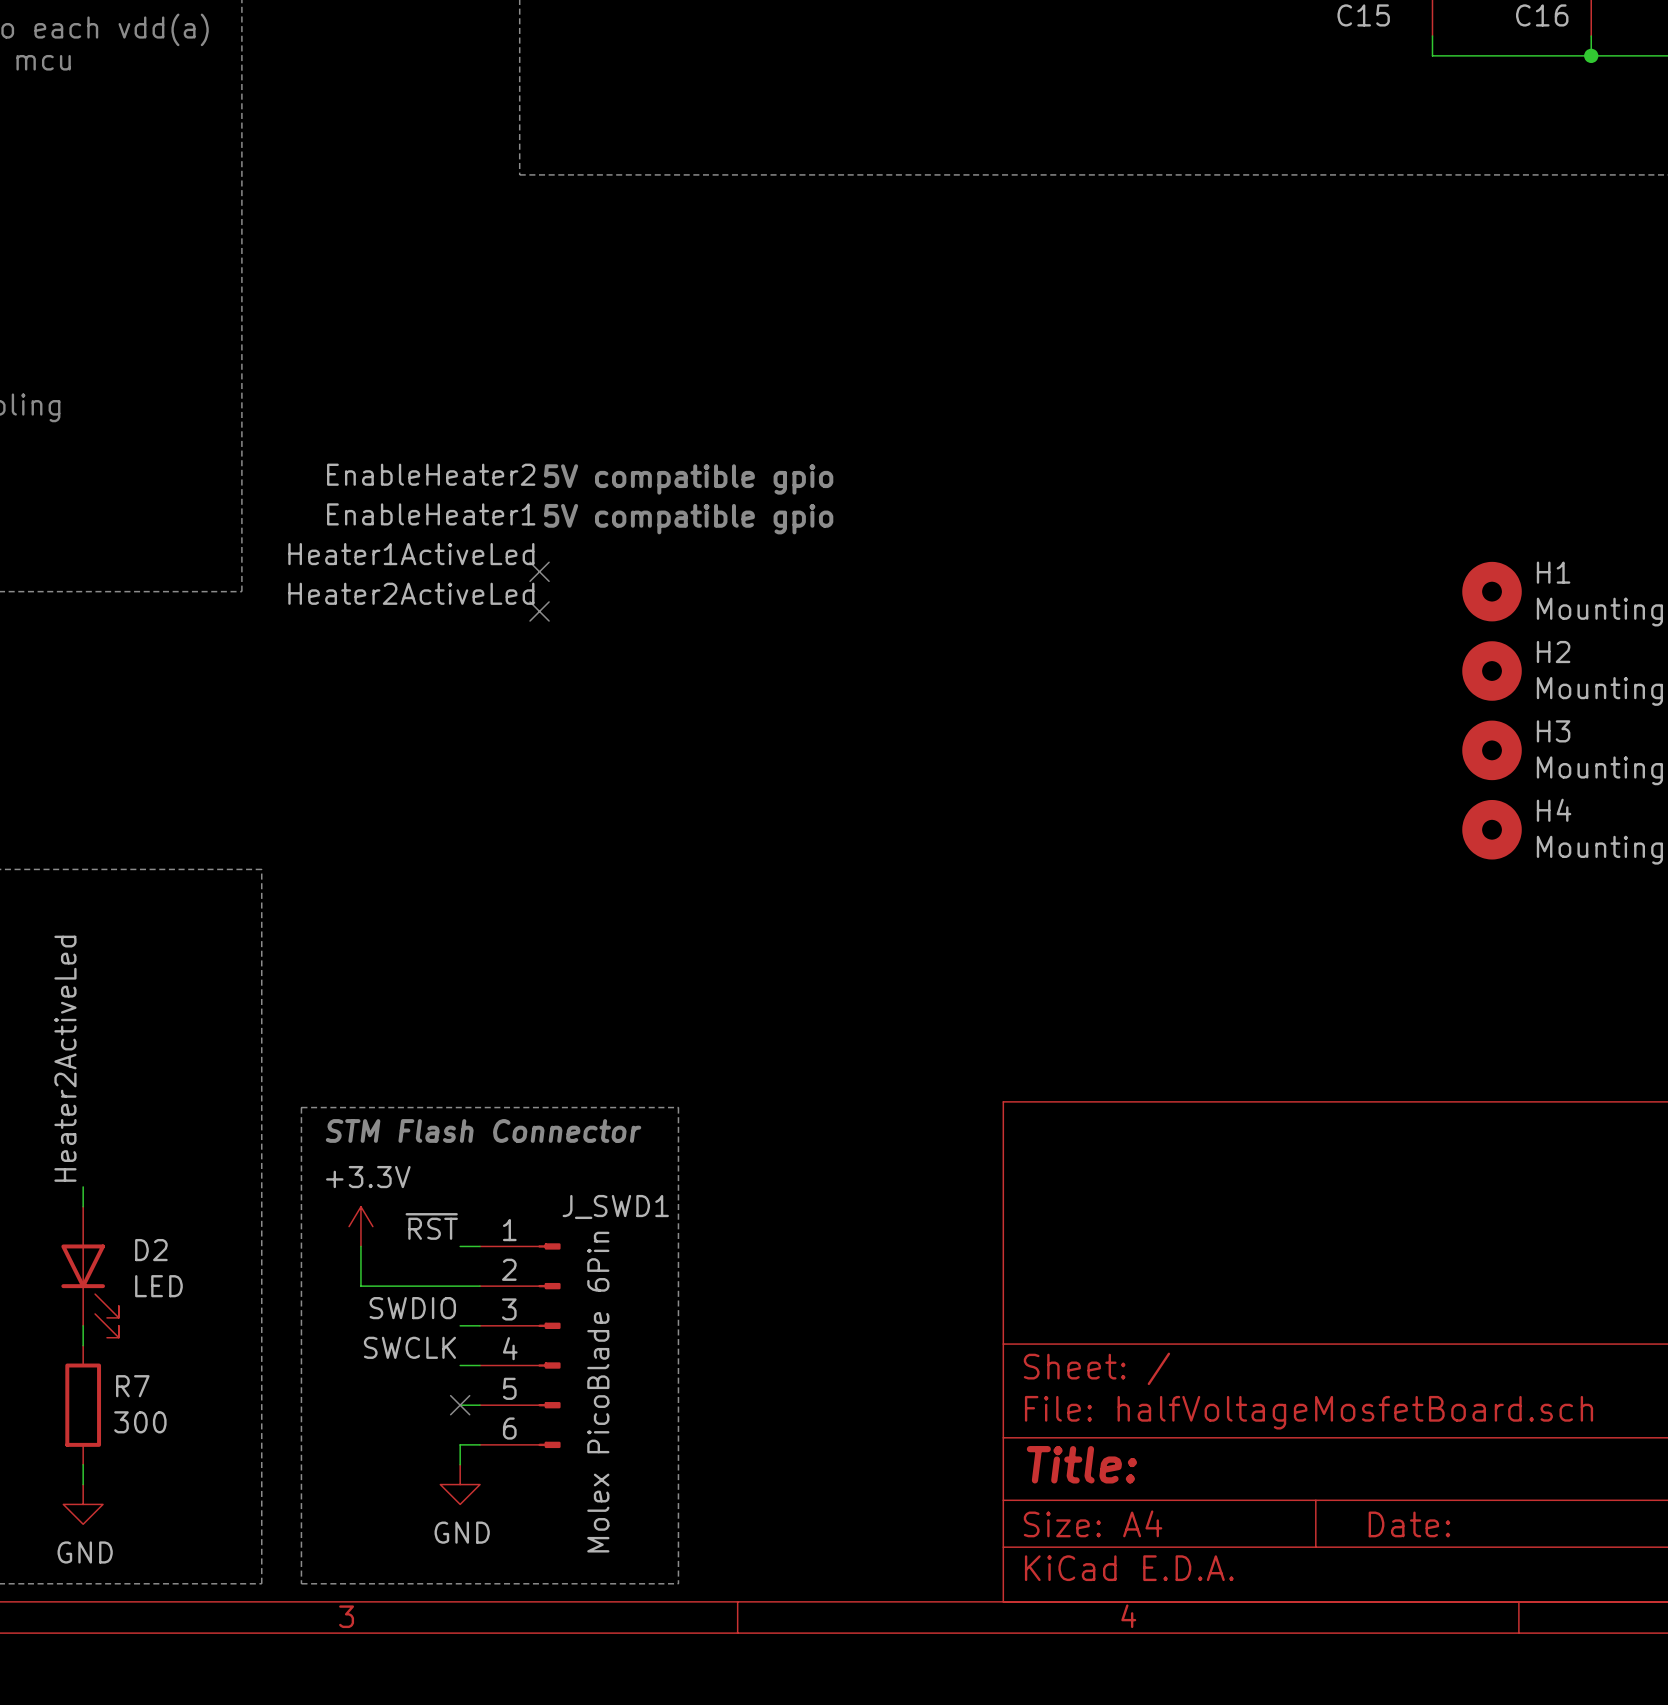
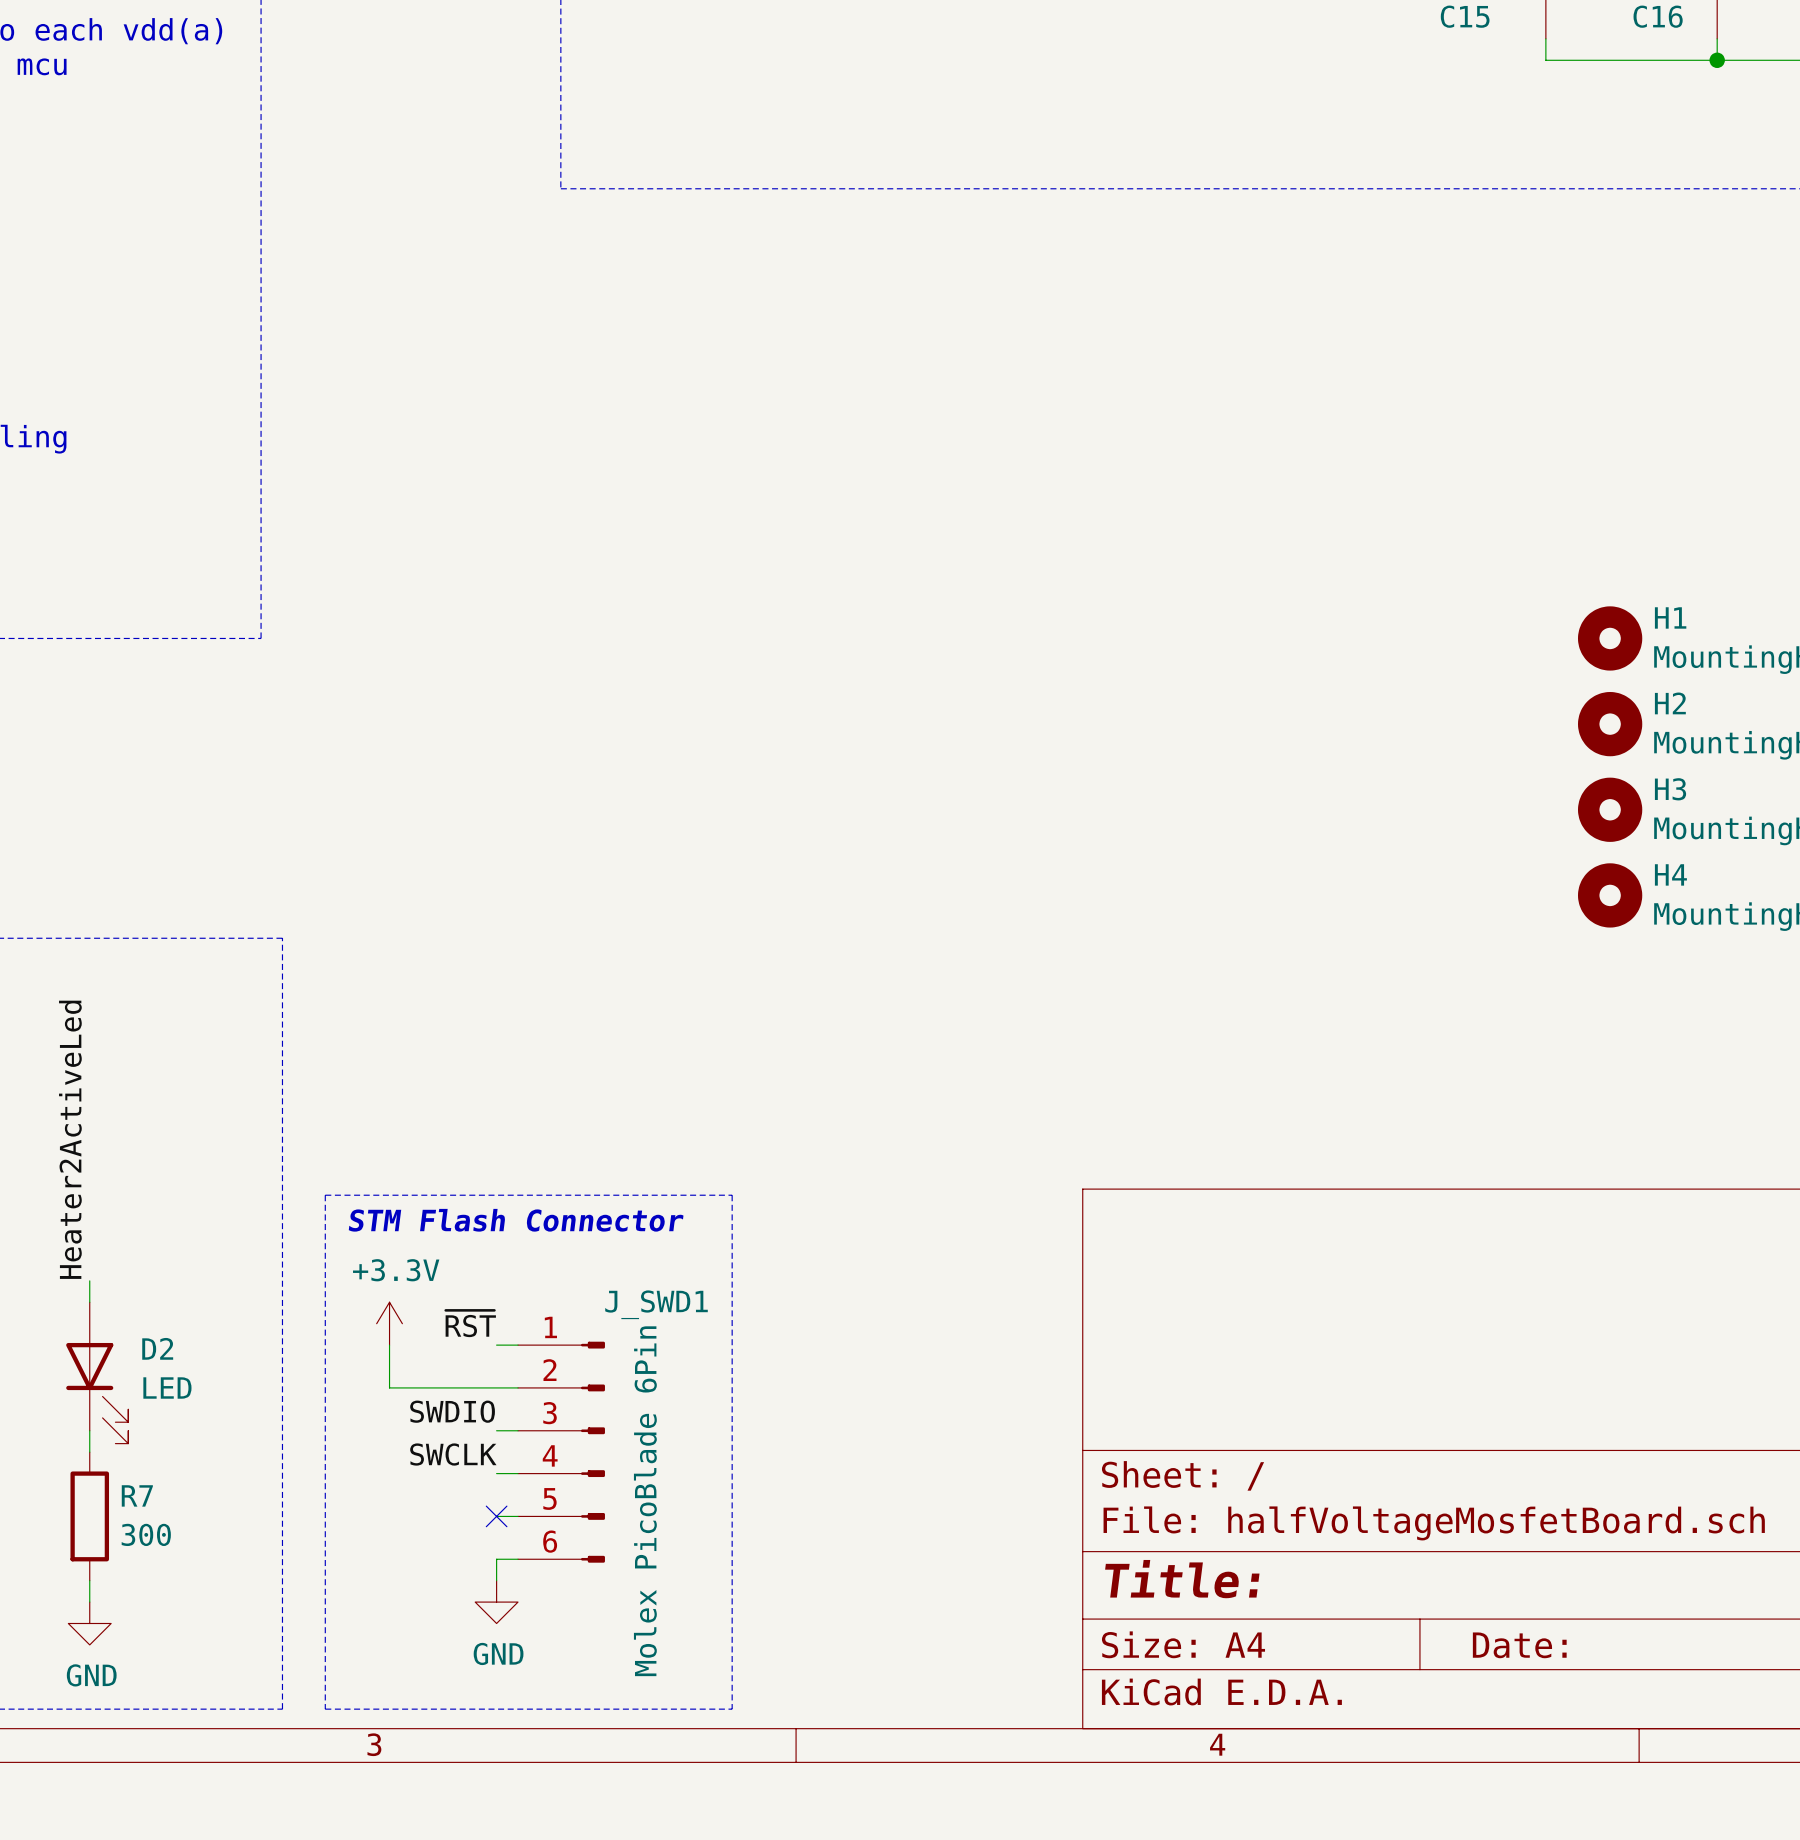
label: EnableHeater2 (431, 474) -> none
text: 5V compatible gpio (688, 479) -> none
label: EnableHeater1 (431, 514) -> none
text: 5V compatible gpio (688, 519) -> none
label: Heater1ActiveLed (411, 554) -> none
no-connect mark: (539, 571) -> none
label: Heater2ActiveLed (411, 593) -> none
no-connect mark: (539, 611) -> none

